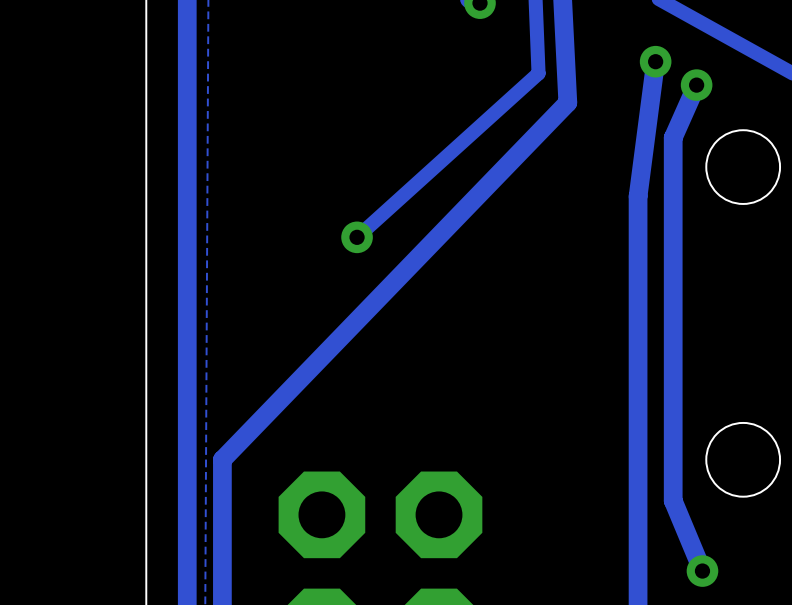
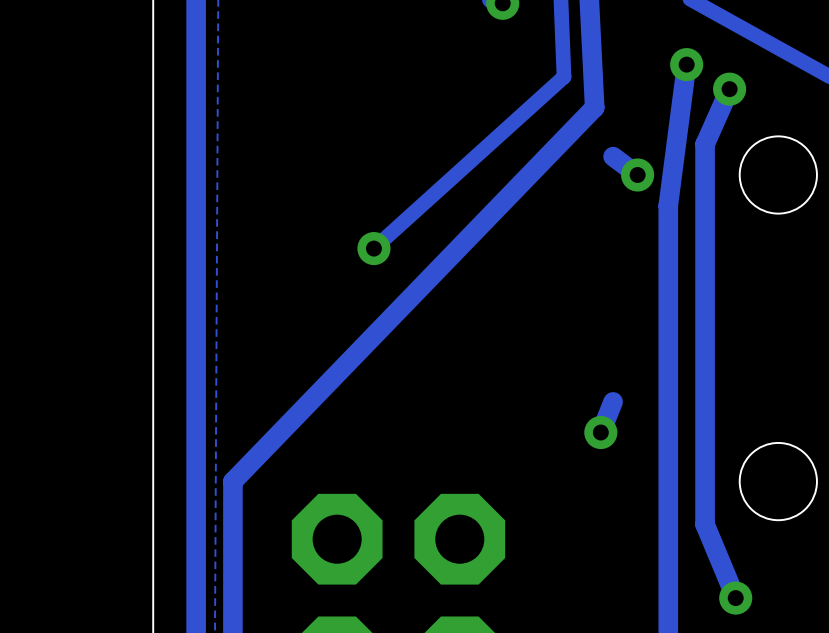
track: none -> (613, 156) (637, 174)
via: none -> (637, 174)
track: none -> (613, 401) (600, 432)
via: none -> (600, 432)

